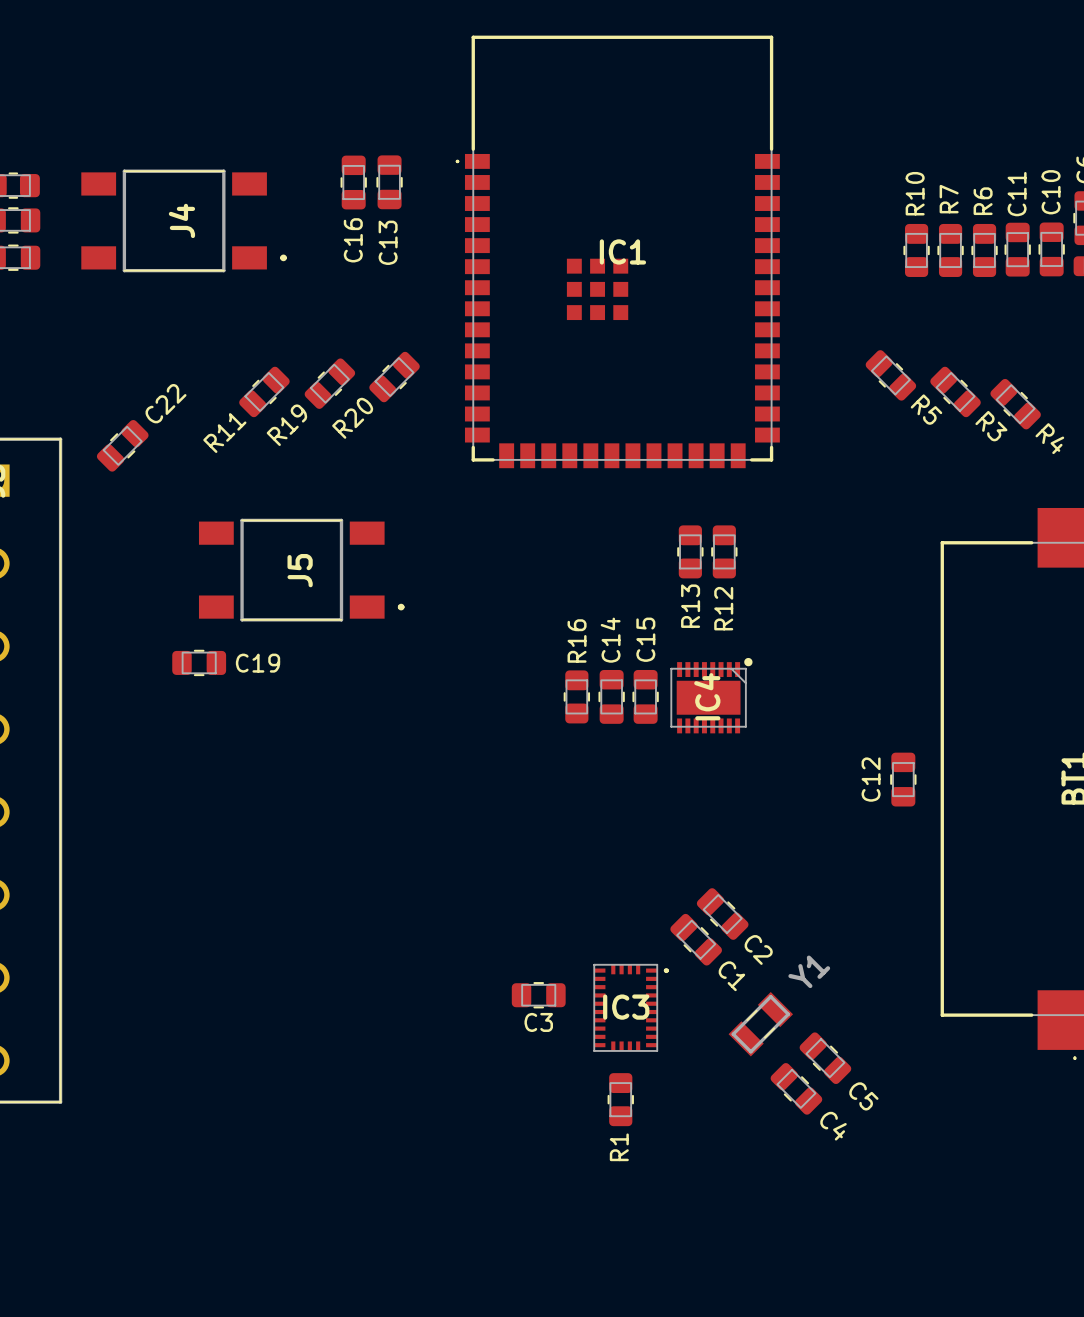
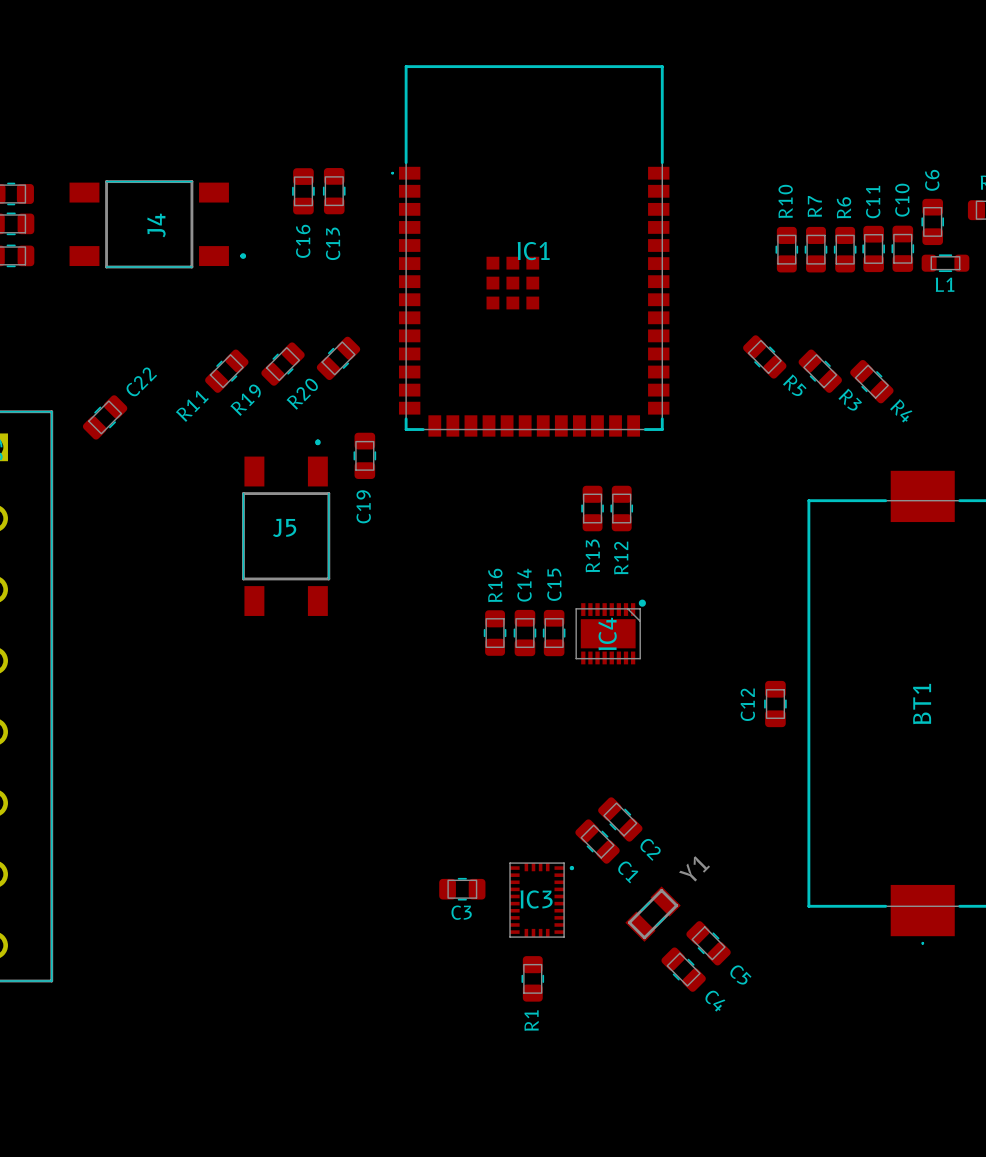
J5 rotation: 0° (301, 570) -> 90° counterclockwise (286, 527)
C19 rotation: 0° (199, 662) -> 90° clockwise (364, 455)
C19 position: (199, 662) -> (364, 455)

